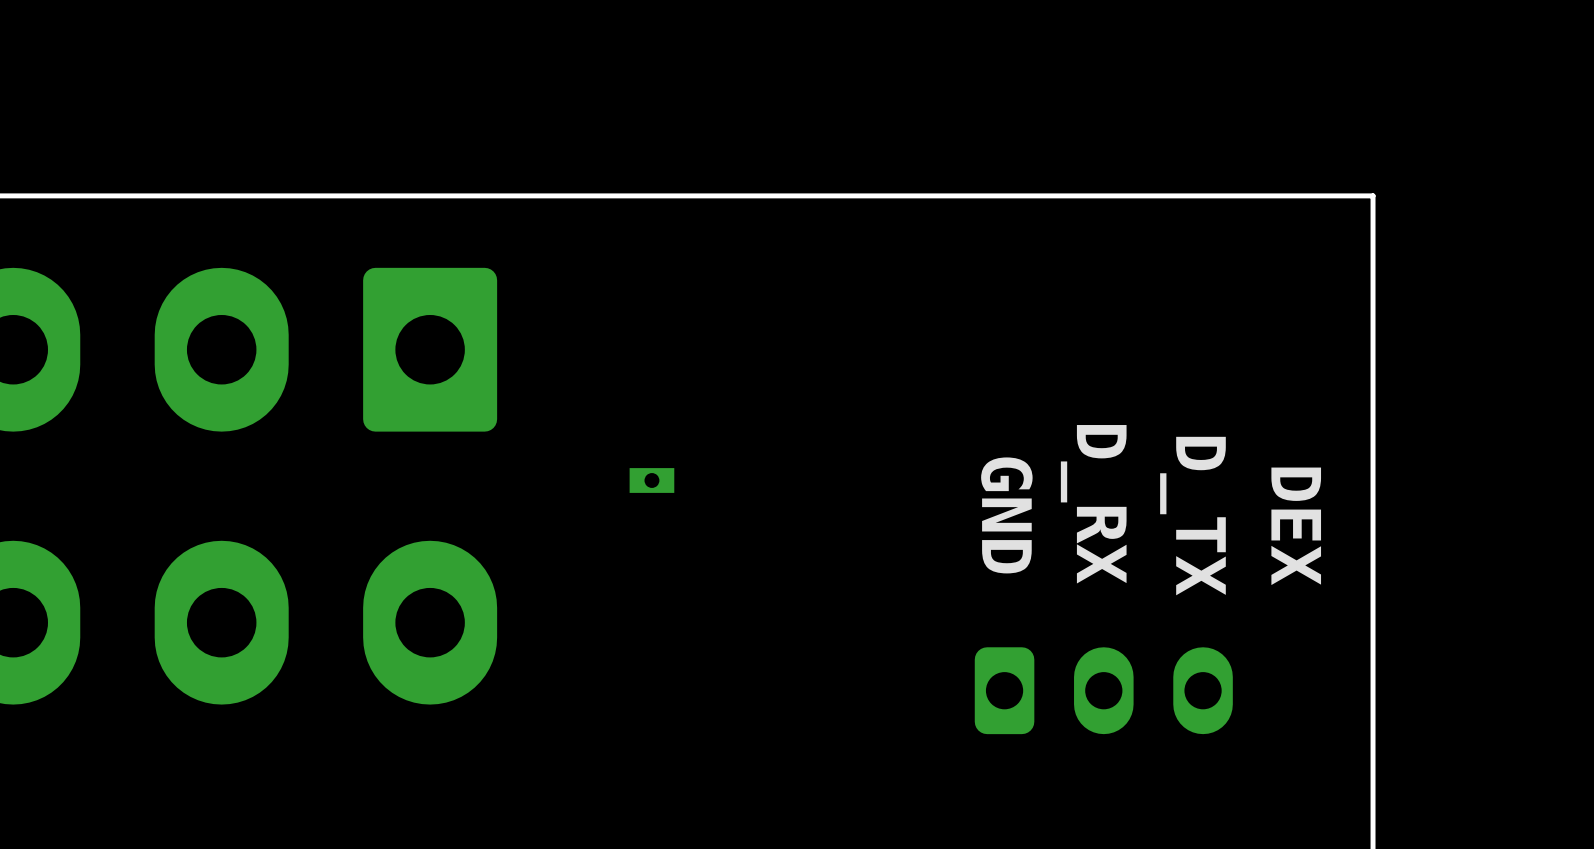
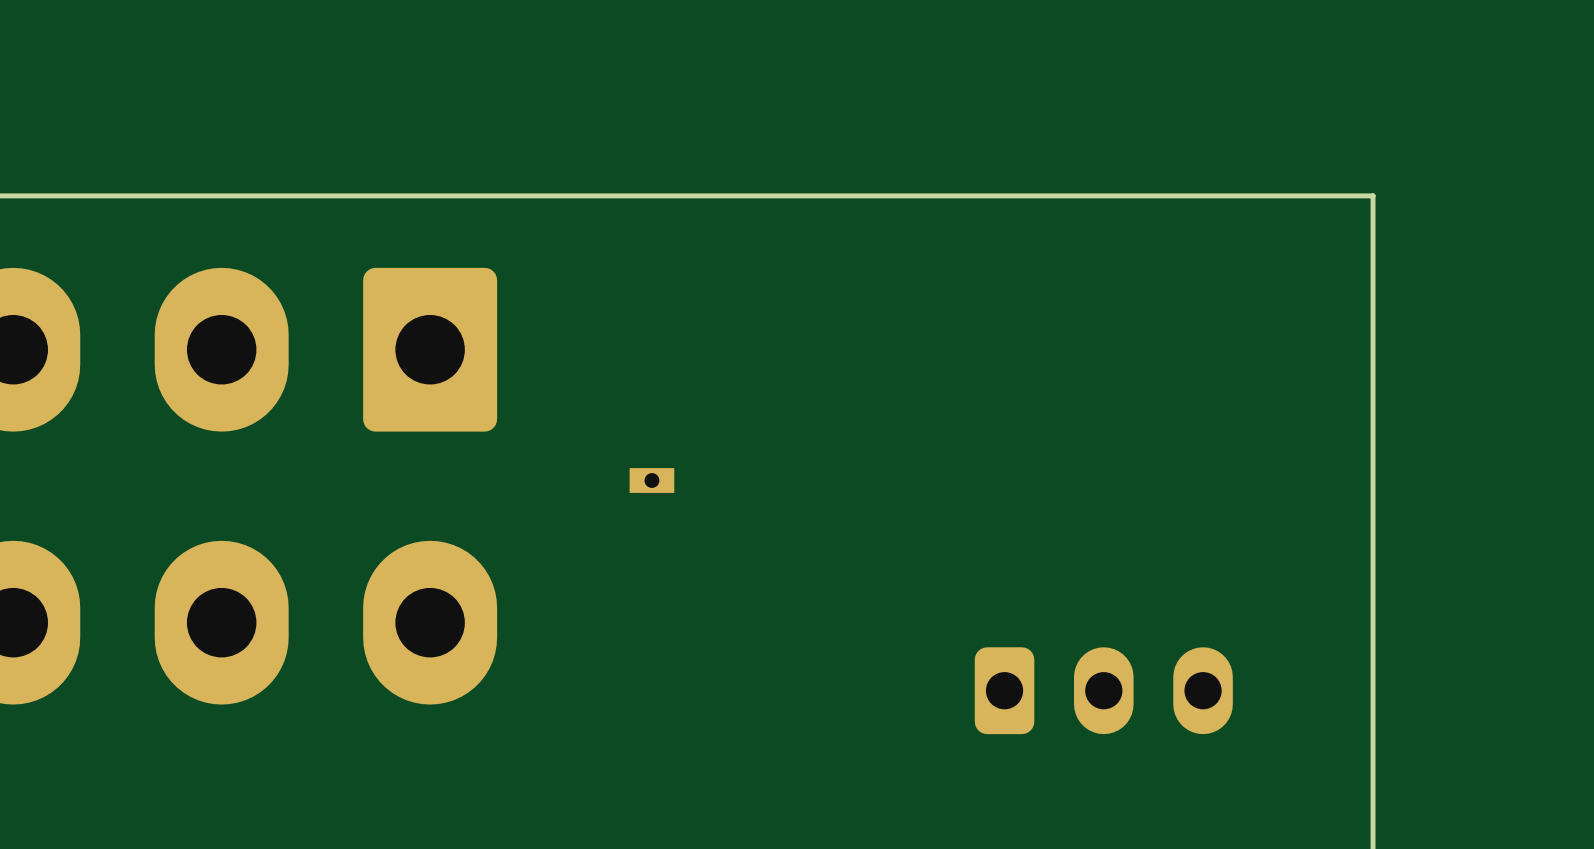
text: D_RX (1093, 504) -> none
text: GND (1006, 515) -> none
text: D_TX (1192, 516) -> none
text: DEX (1296, 526) -> none

